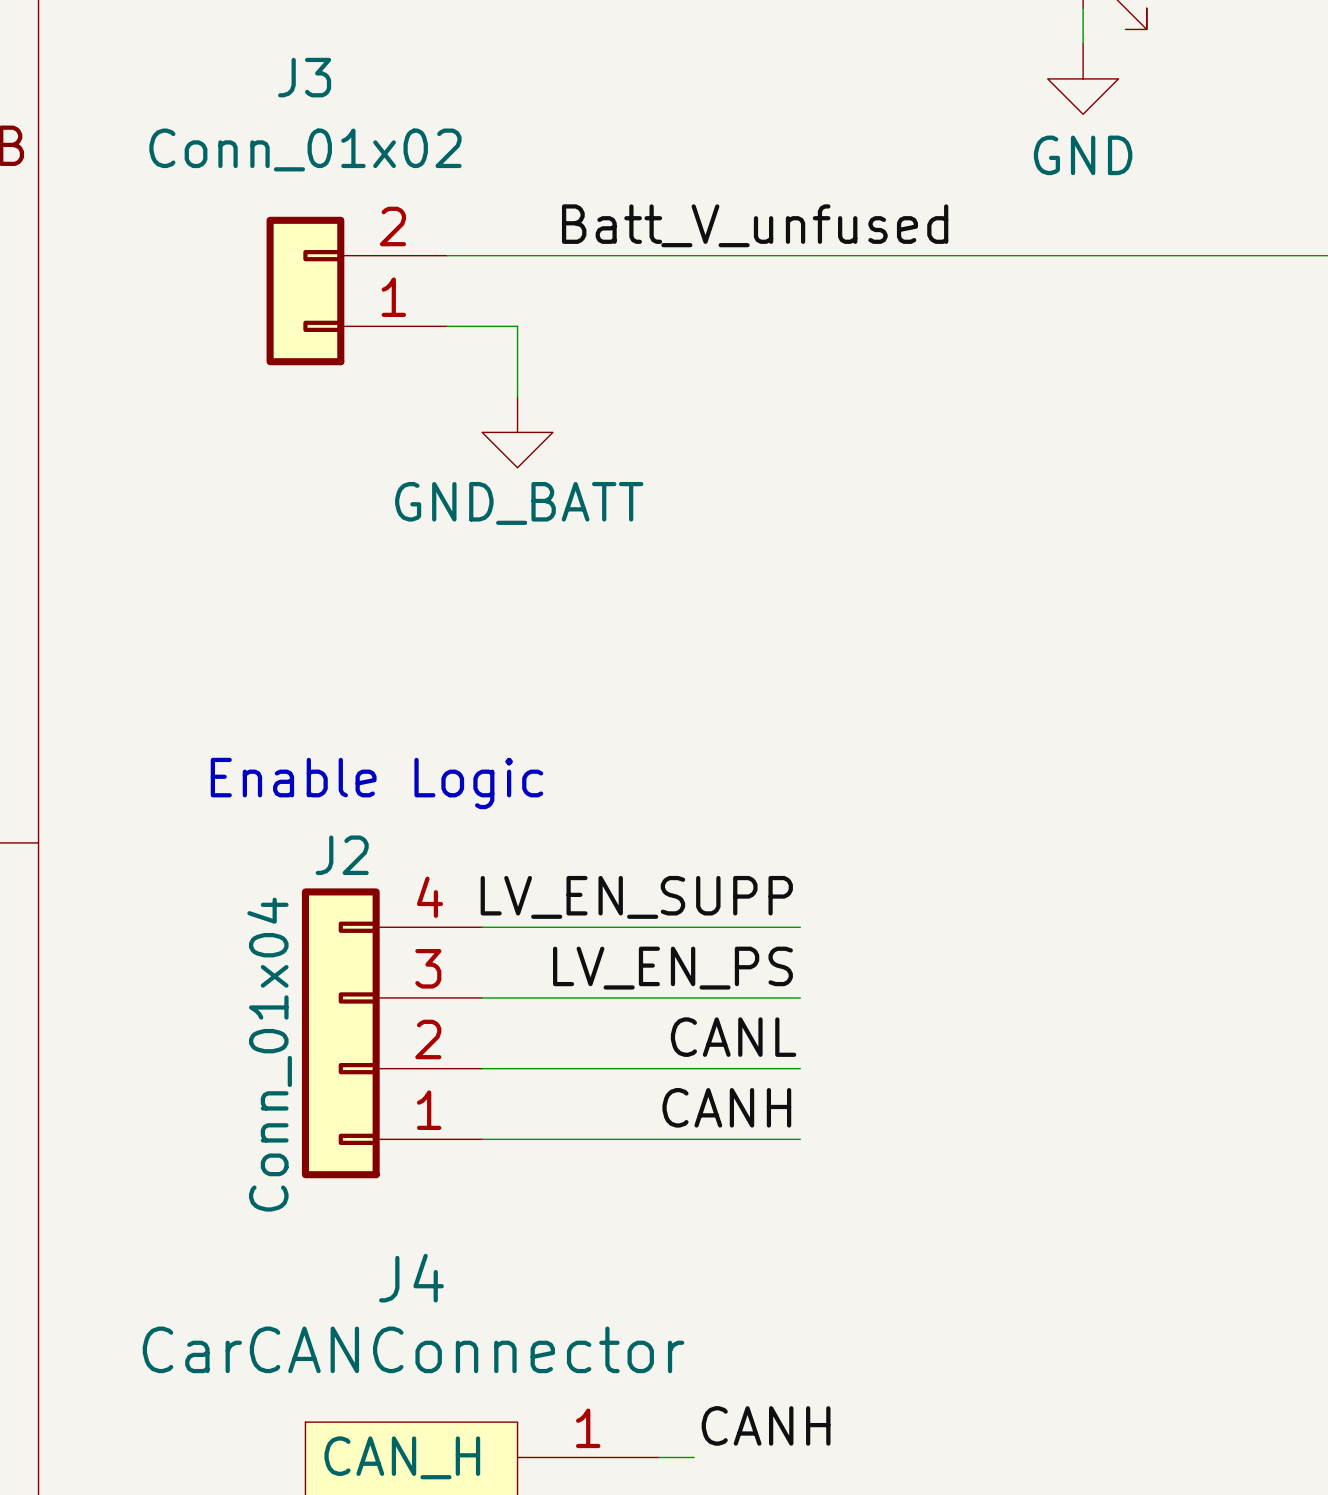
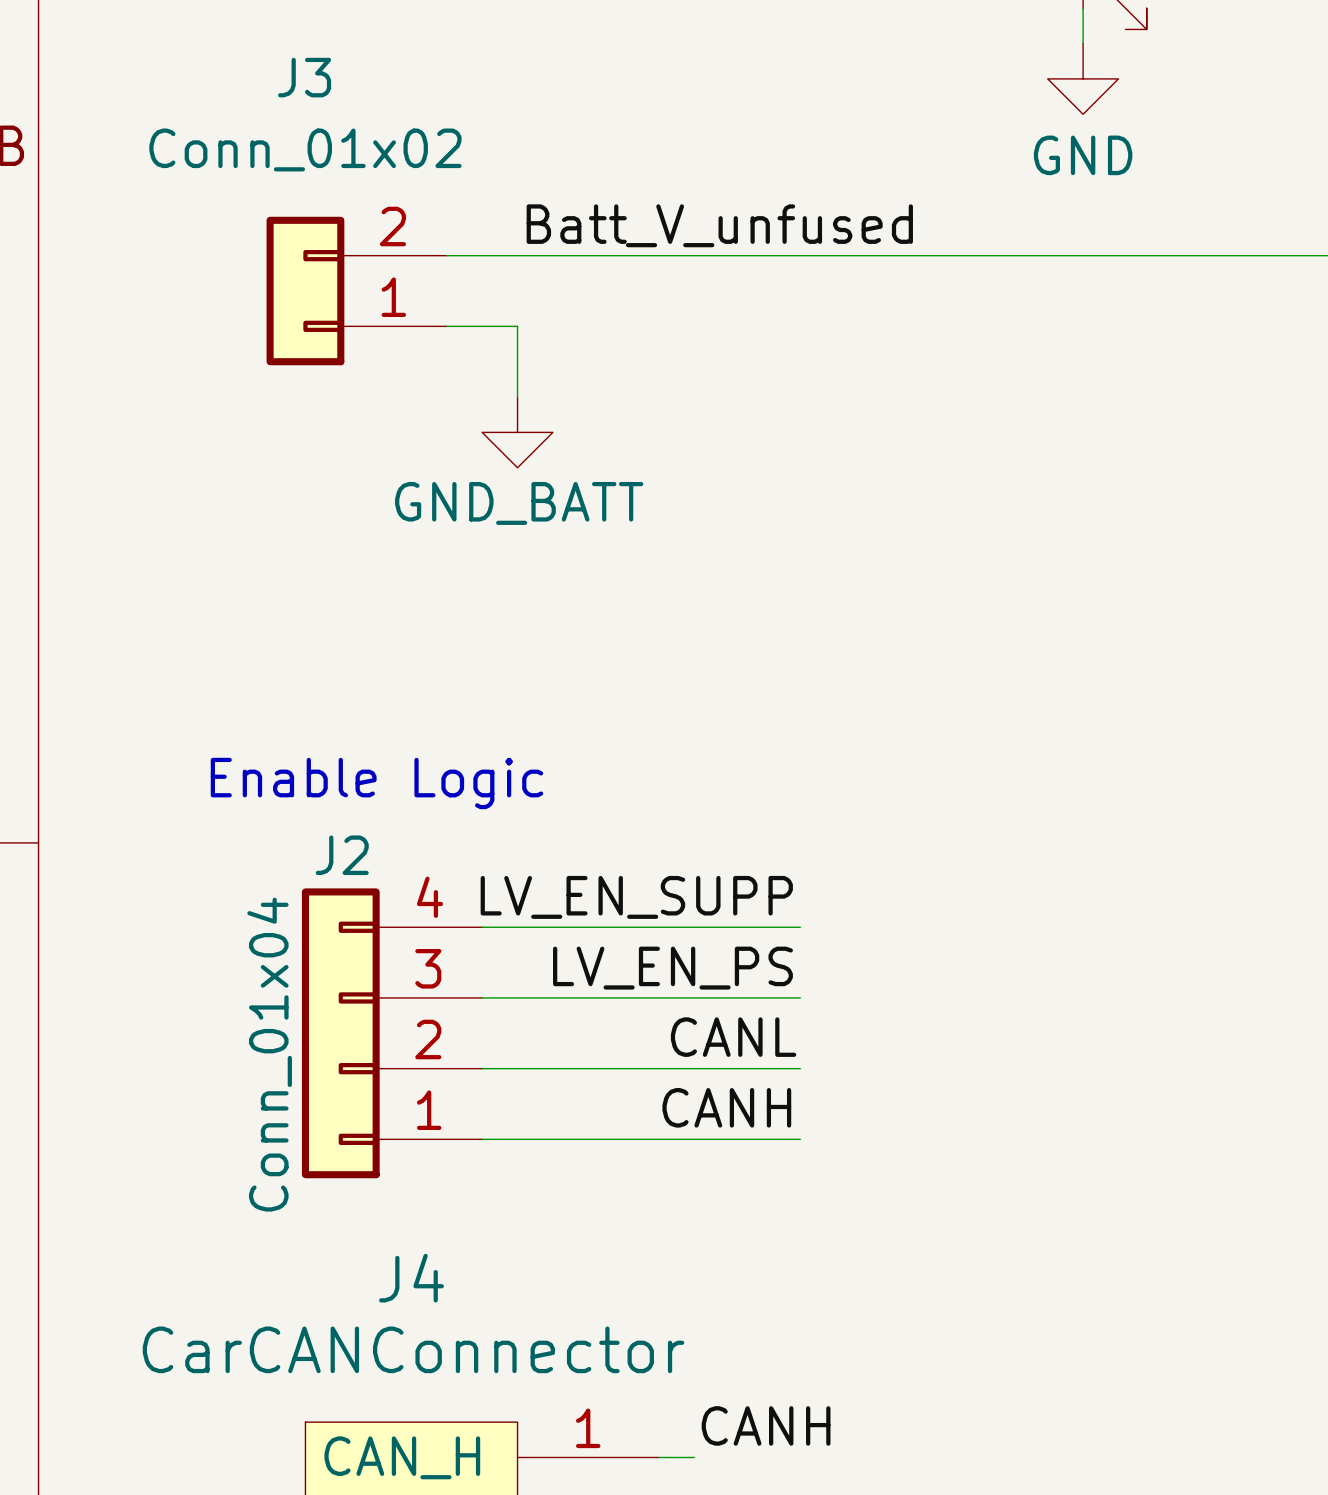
label position: Batt_V_unfused (755, 225) -> Batt_V_unfused (719, 225)

